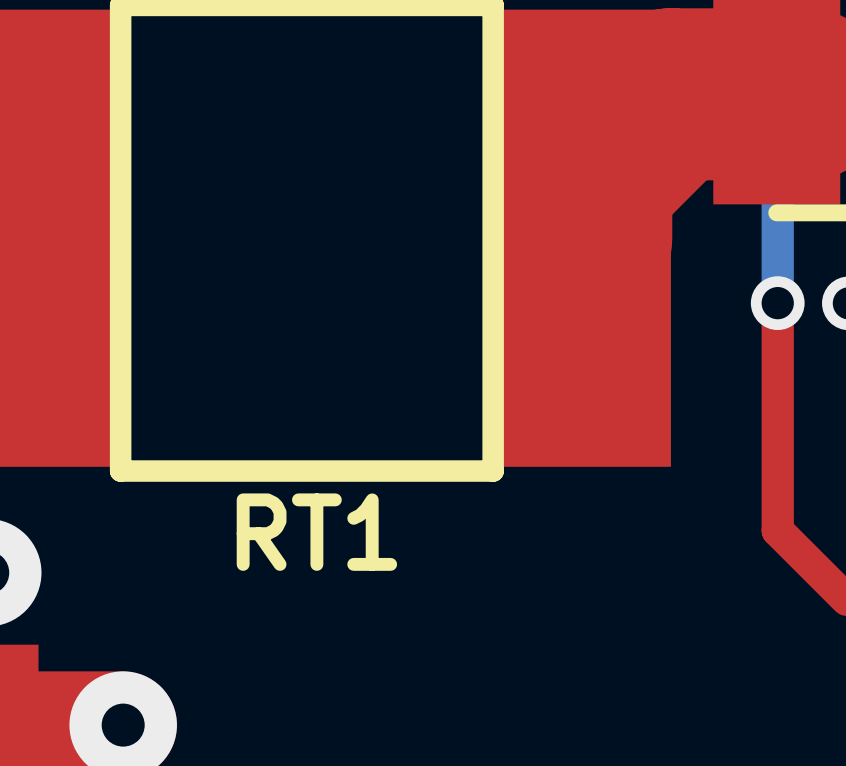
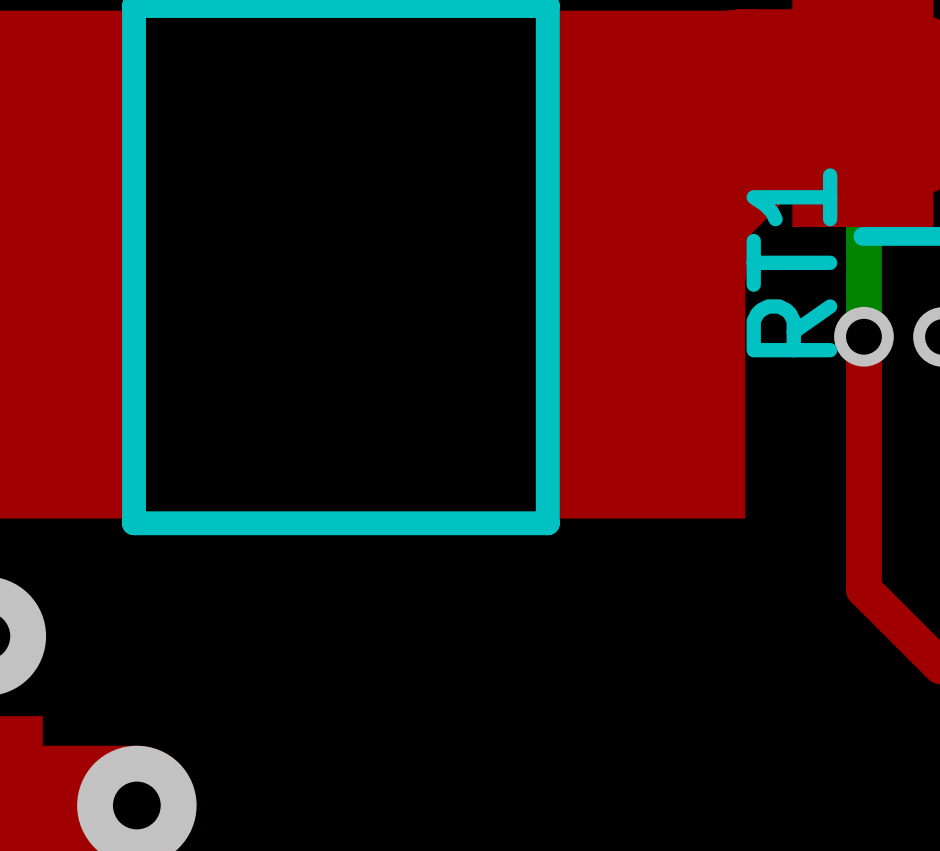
RT1 name rotation: 0° (316, 532) -> 90° counterclockwise (791, 262)
RT1 name position: RT1 (316, 532) -> RT1 (791, 262)

